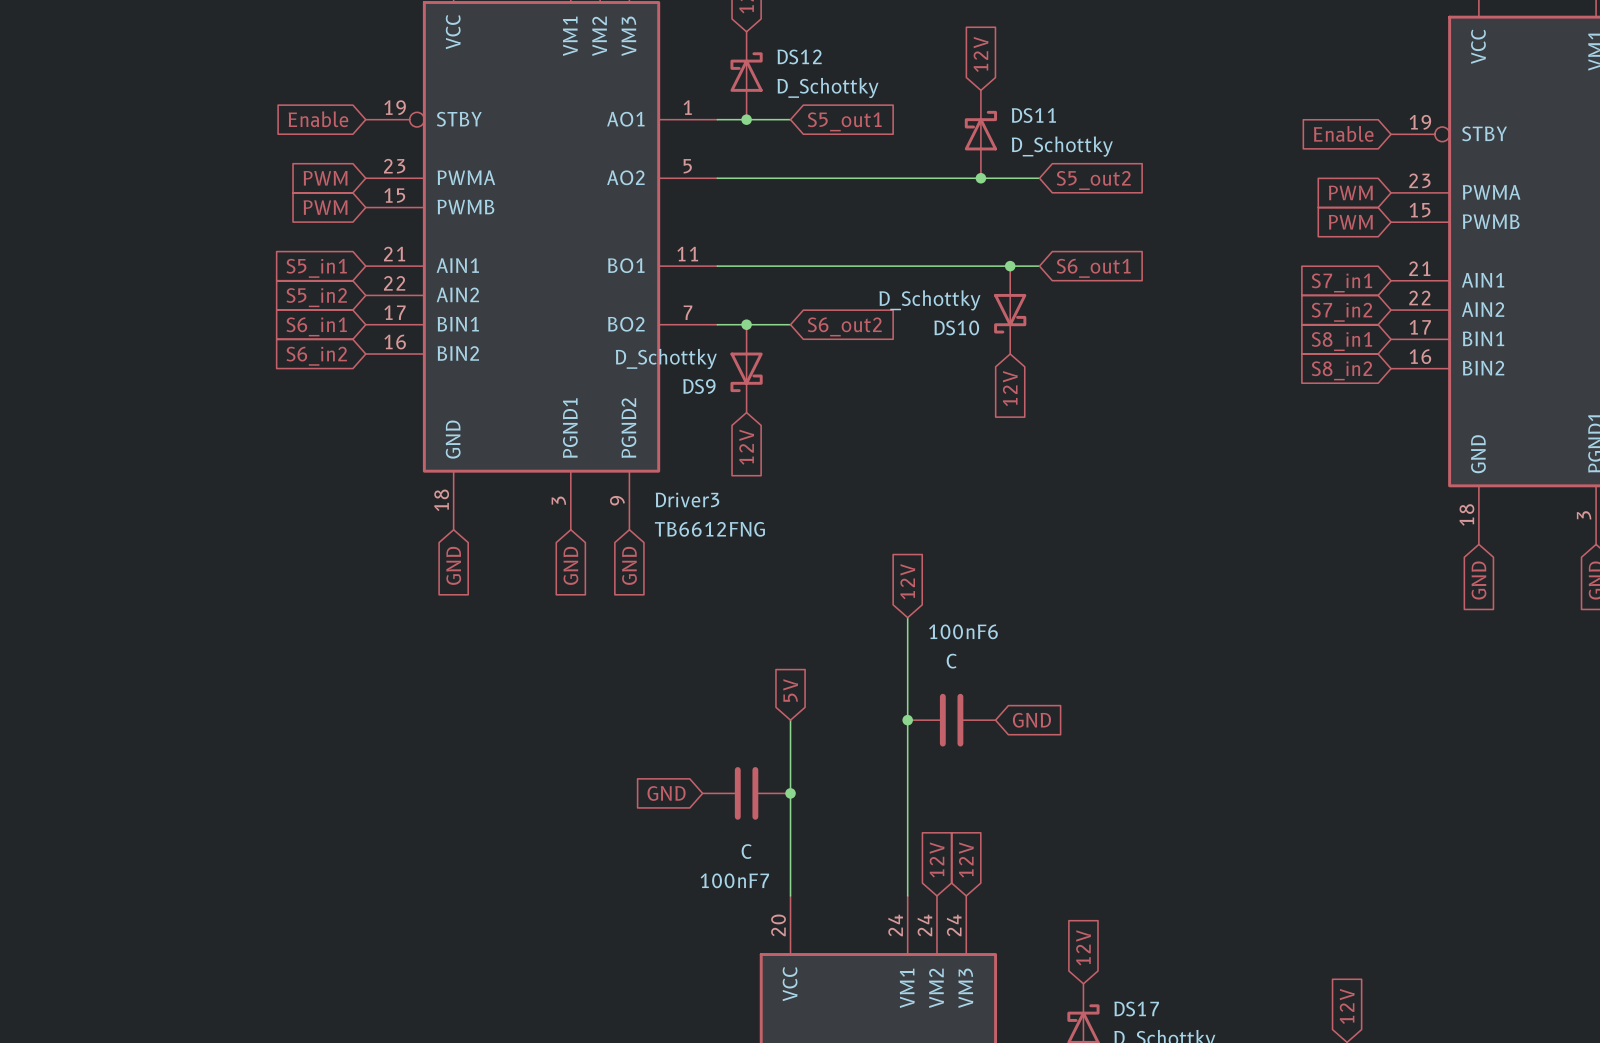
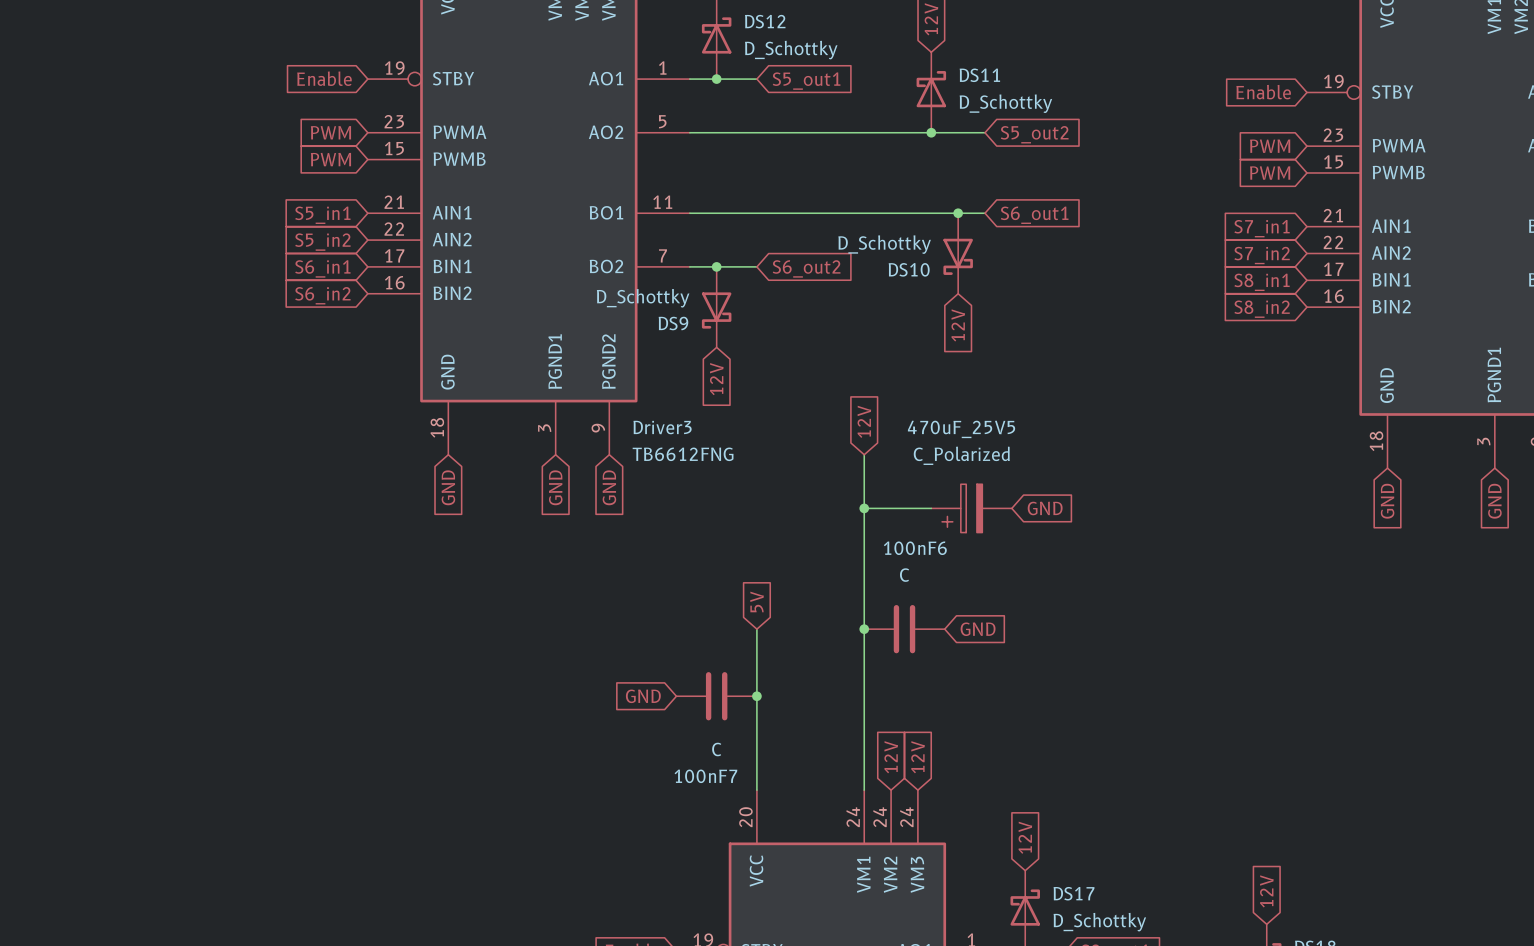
wire: none -> (864, 454) (864, 535)
global label position: 12V (907, 581) -> 12V (864, 421)
wire: none -> (864, 508) (931, 508)
junction: none -> (864, 508)
470uF_25V5: none -> C_Polarized (971, 508)
global label: none -> GND (1045, 508)

